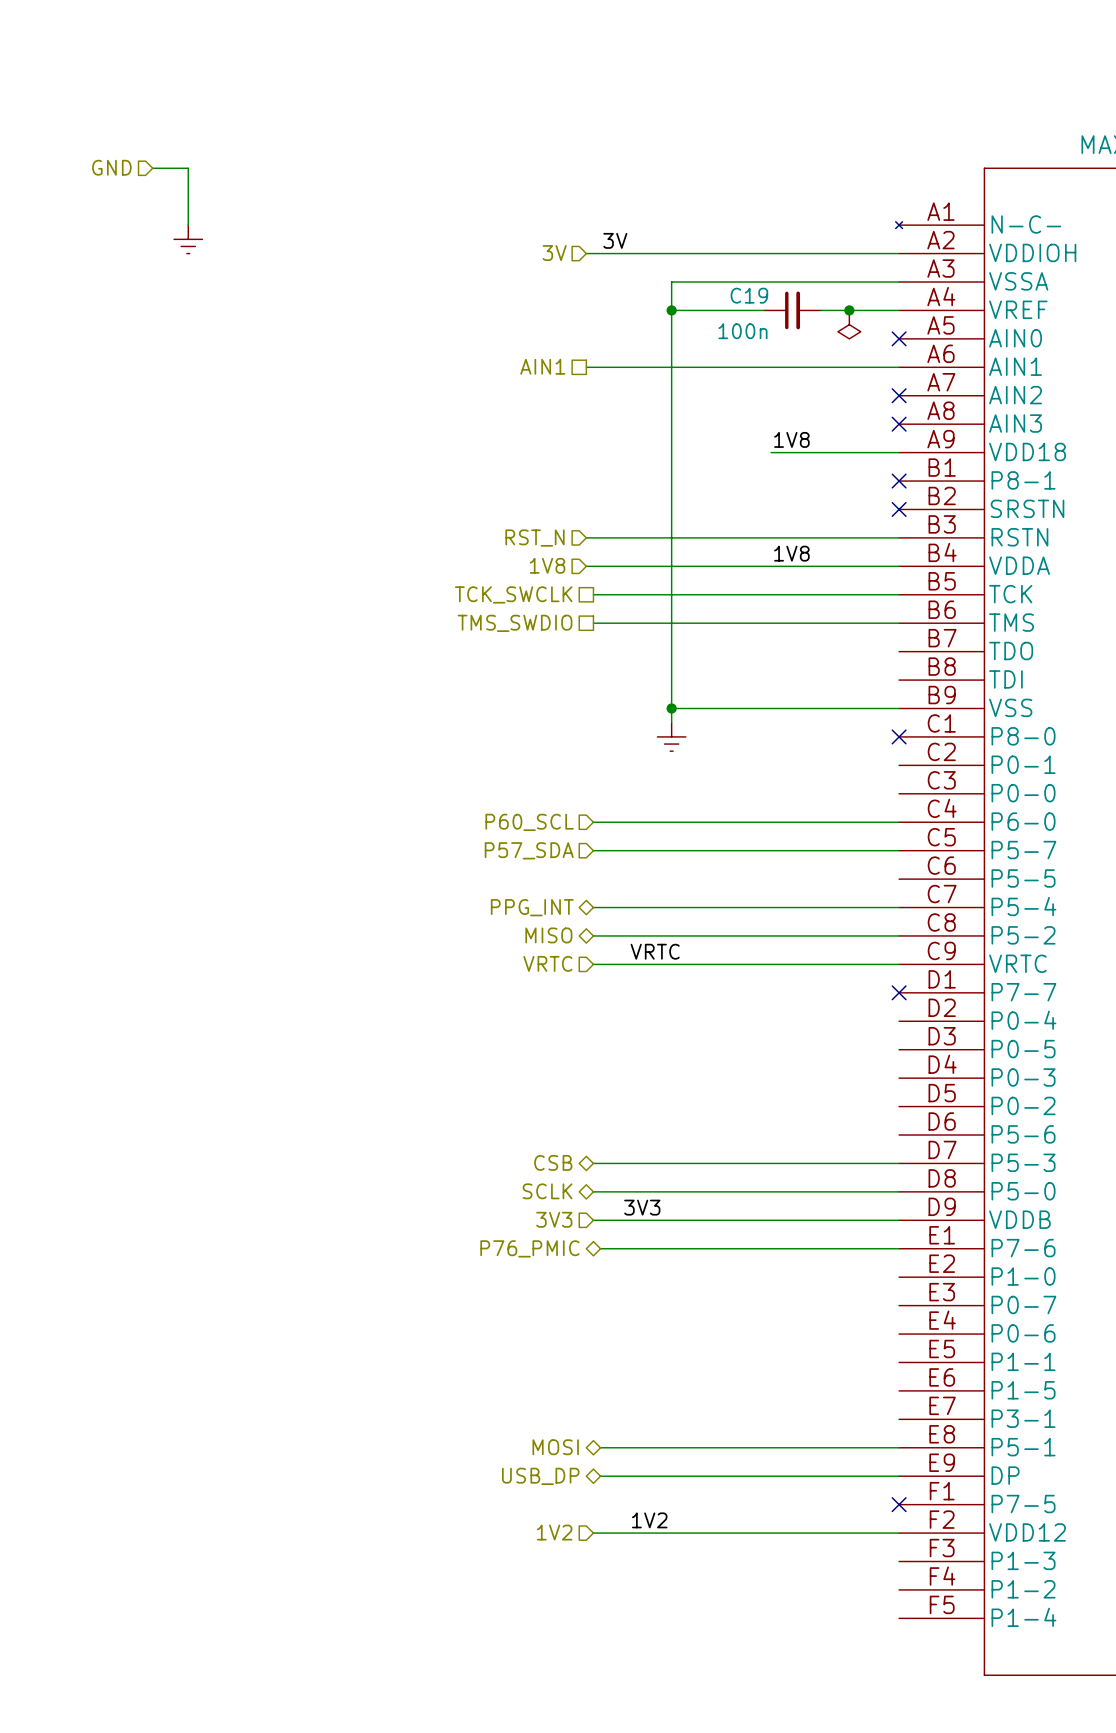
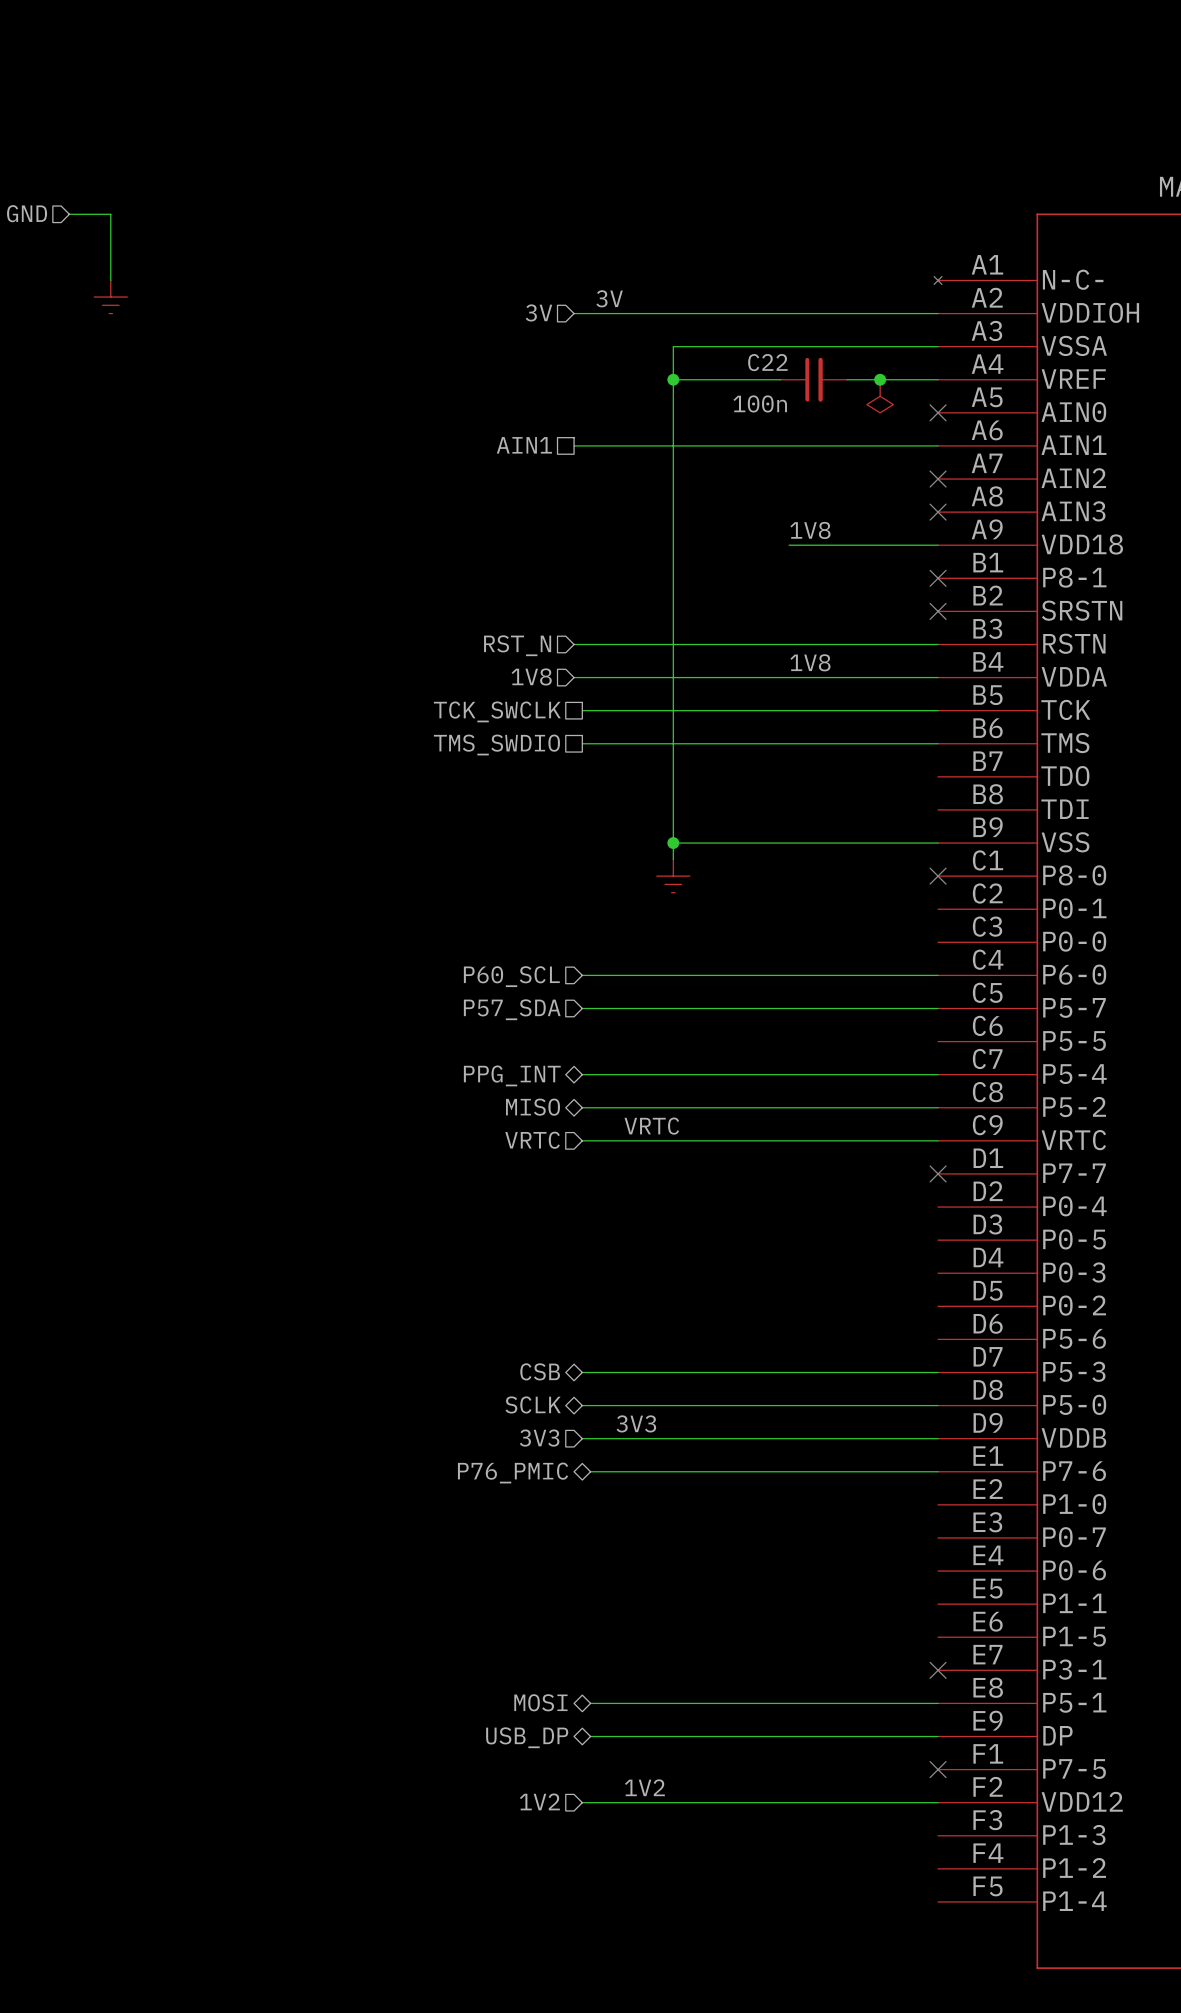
C19 name: C19 (749, 295) -> C22 (767, 362)
no-connect mark: none -> (938, 1670)

